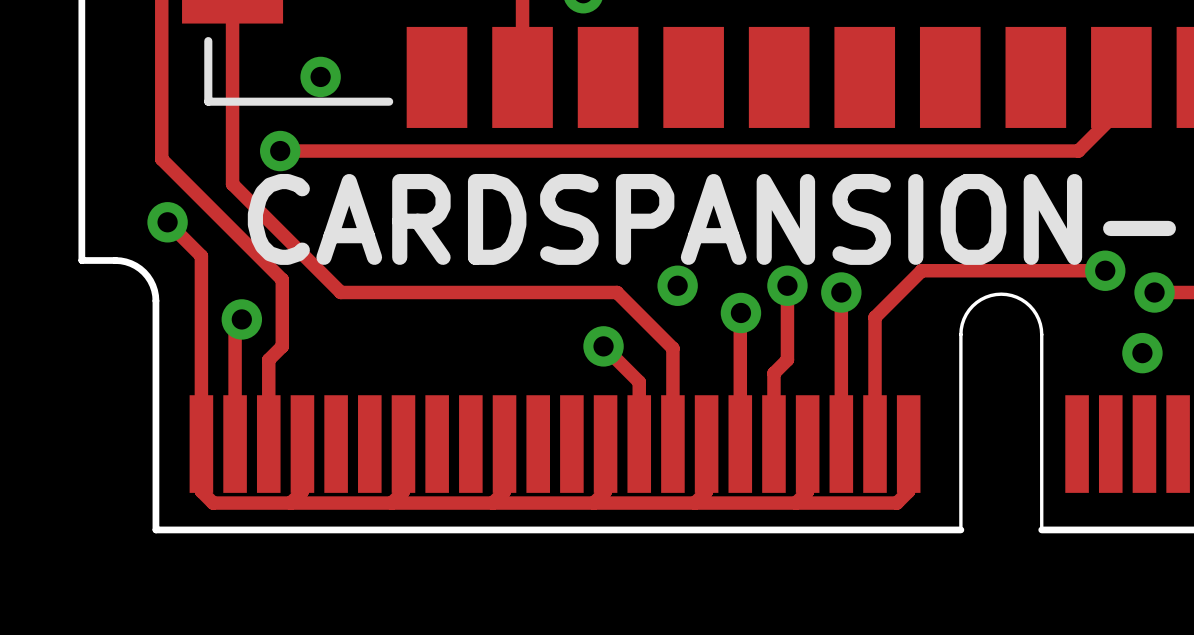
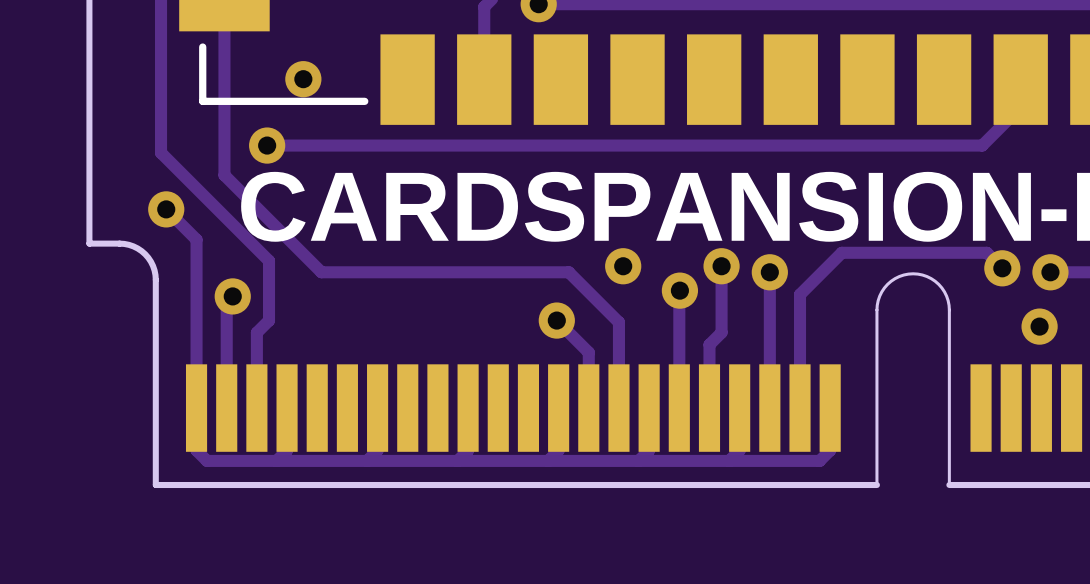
via position: (1105, 270) -> (1002, 268)

